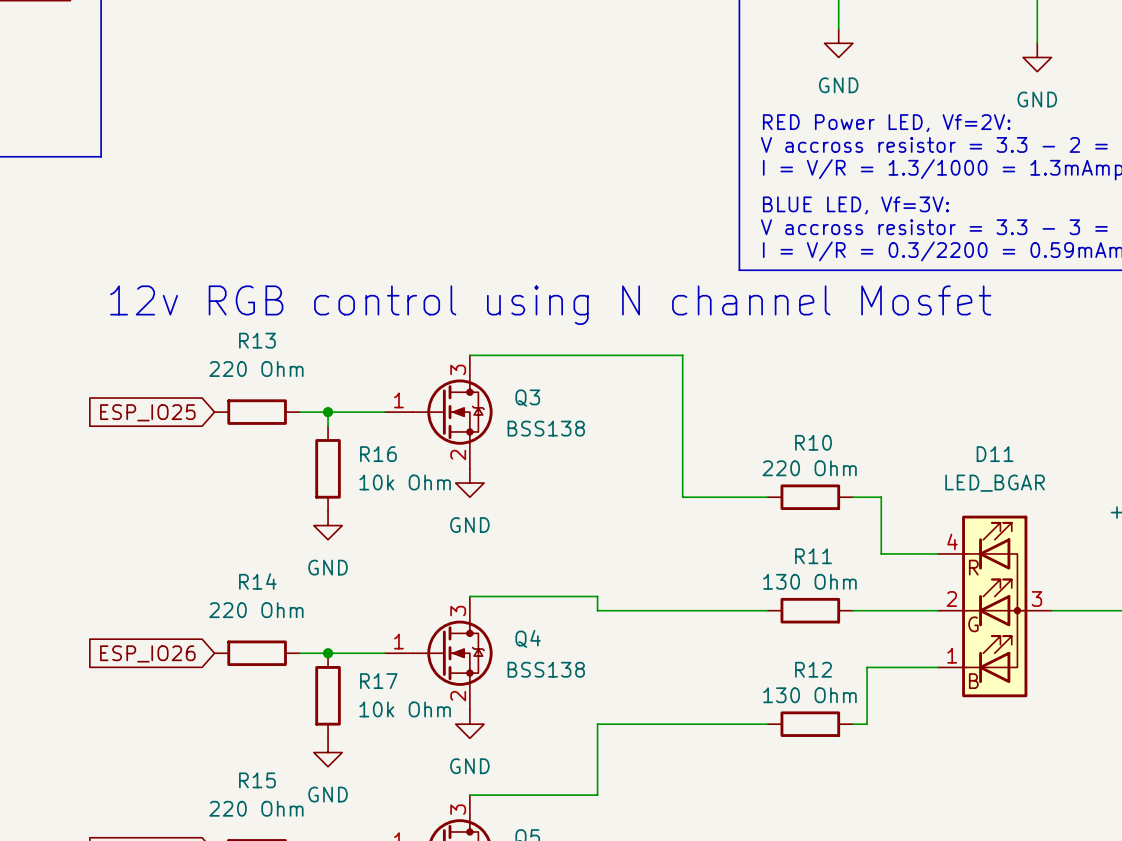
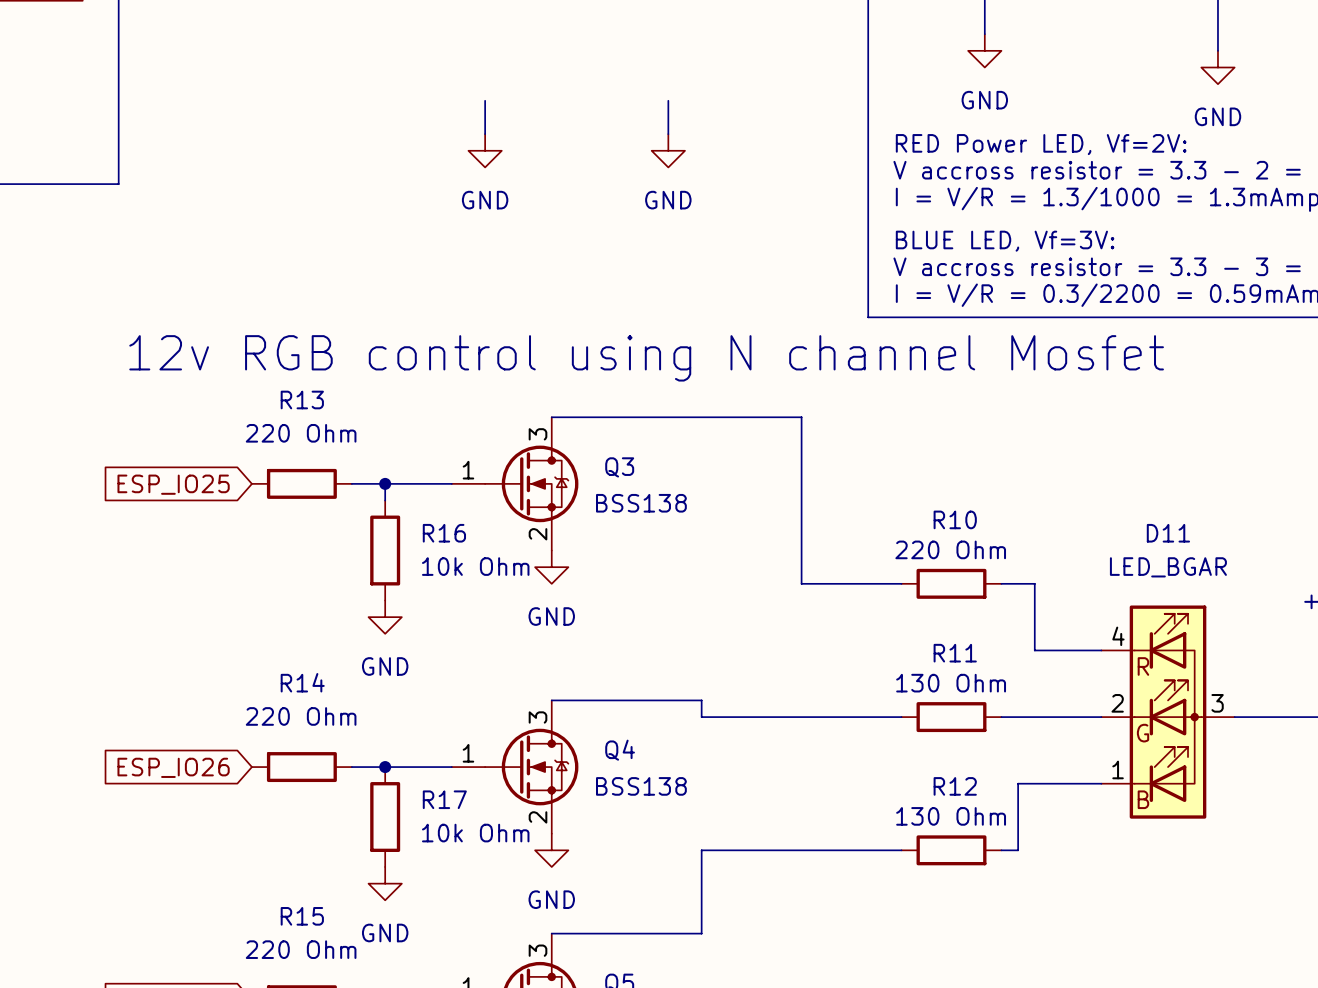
wire: none -> (485, 100) (485, 134)
wire: none -> (668, 100) (668, 134)
power symbol: none -> GND (485, 150)
power symbol: none -> GND (668, 150)

